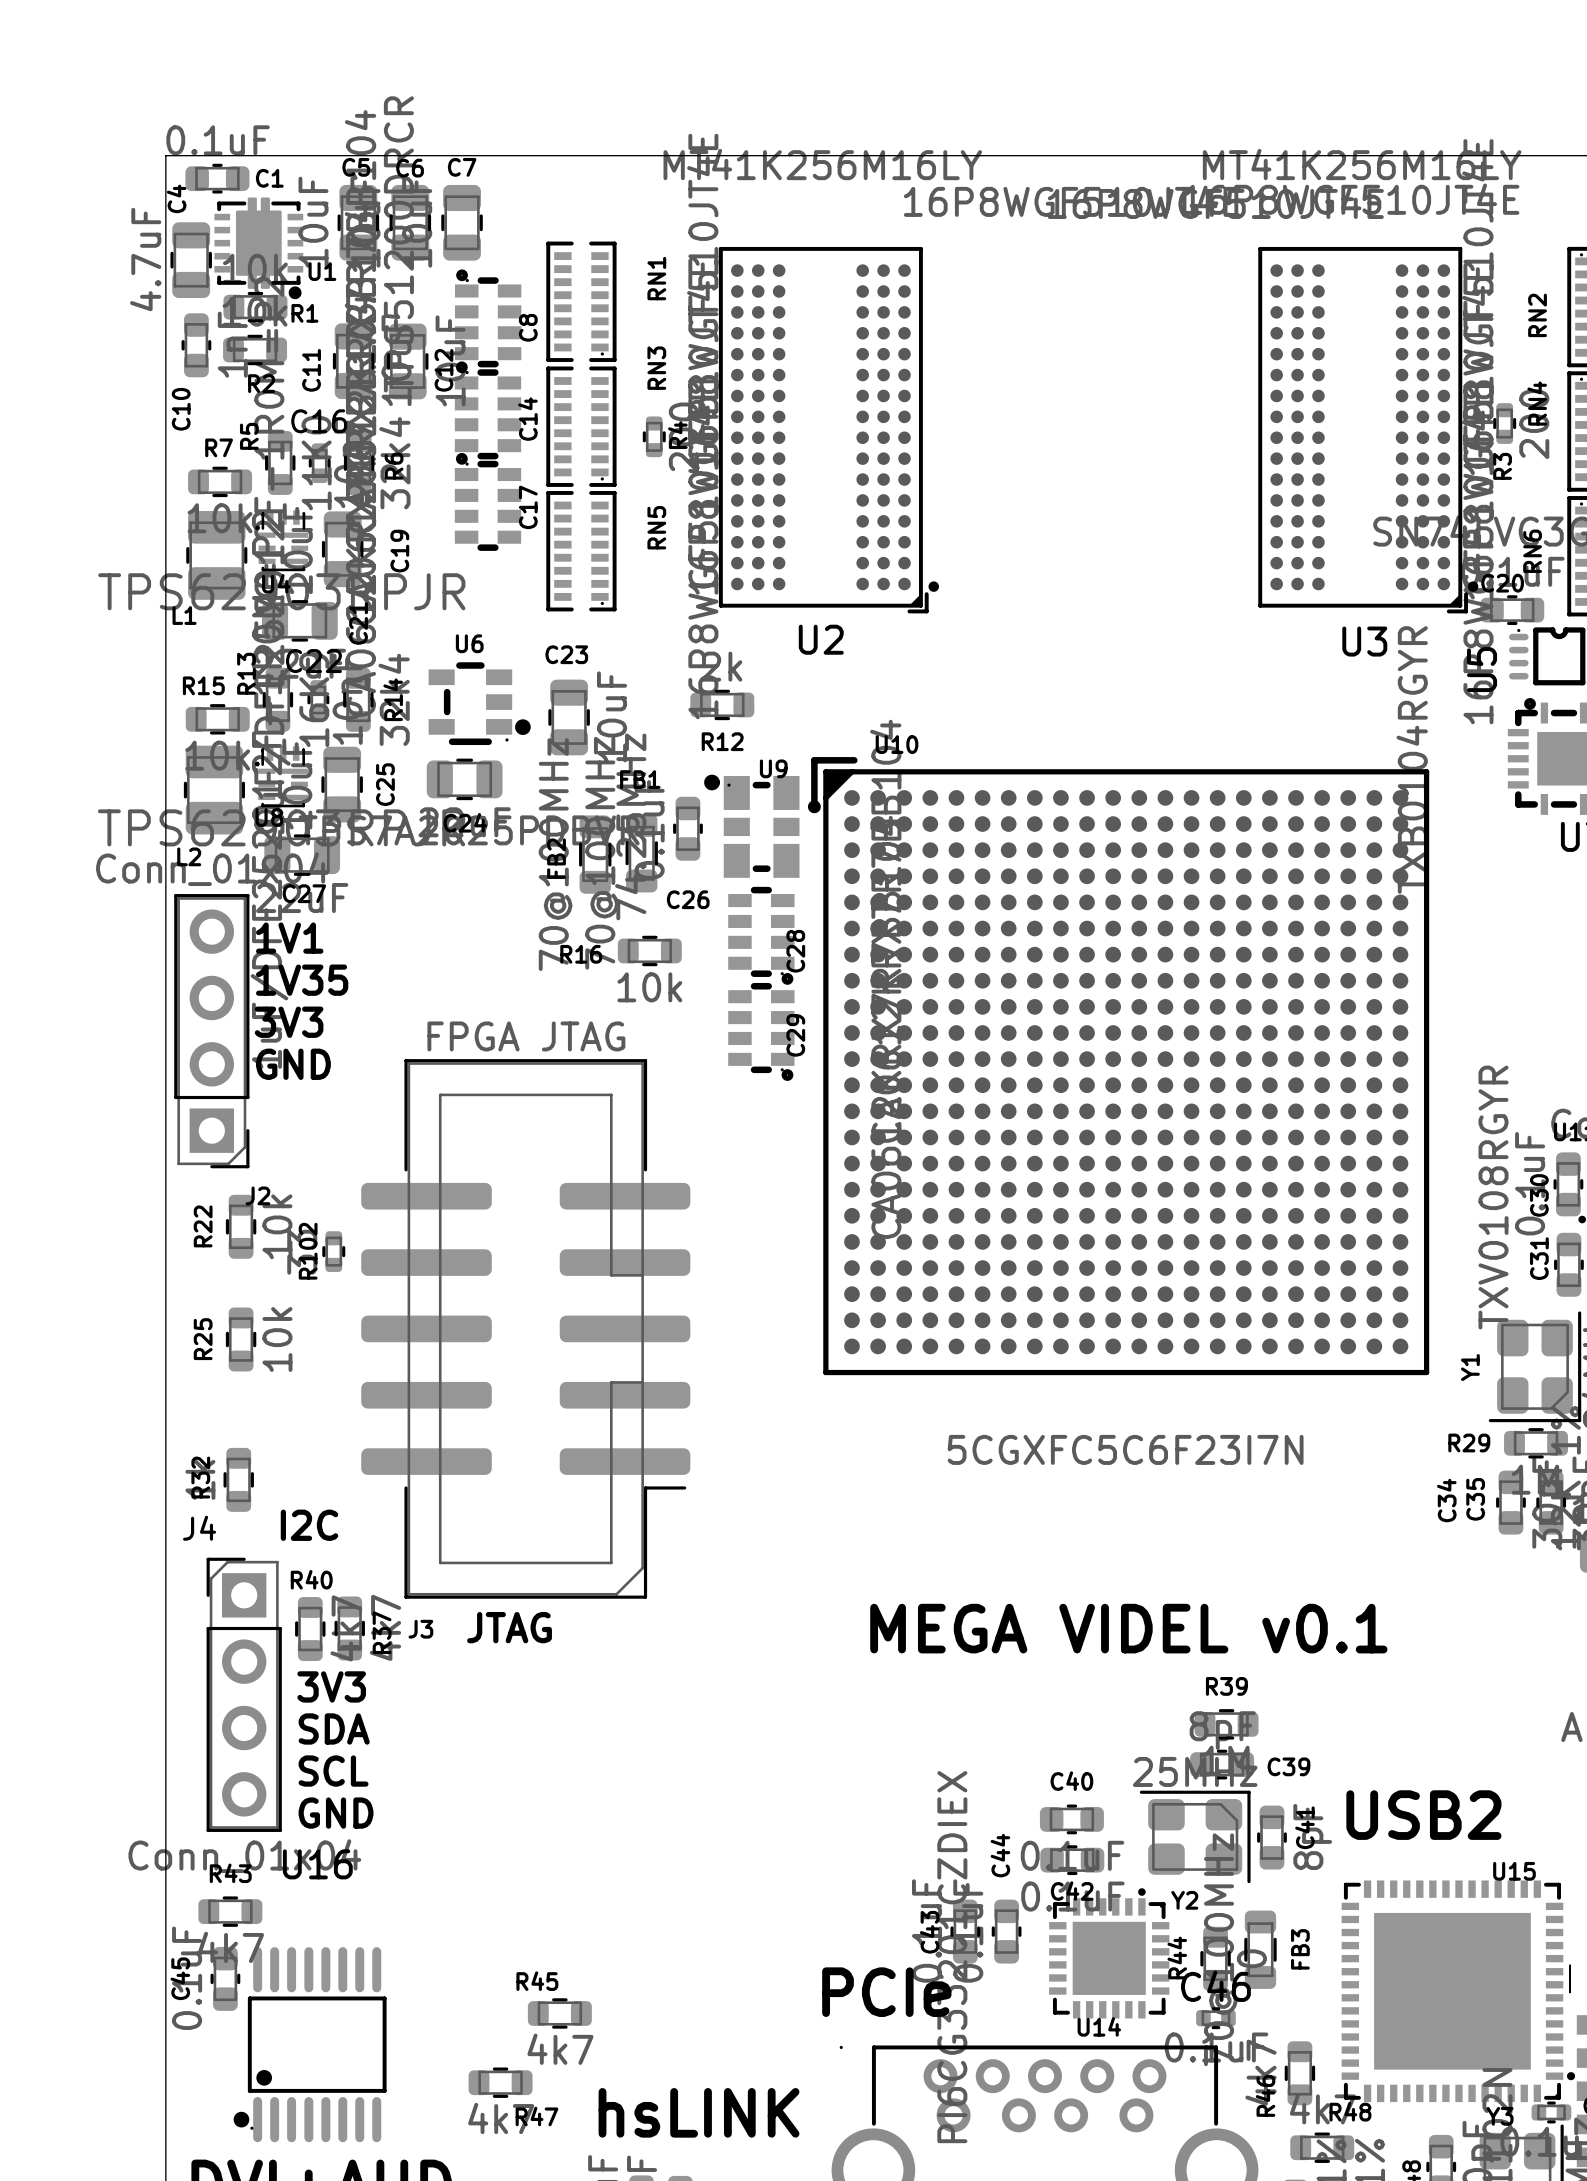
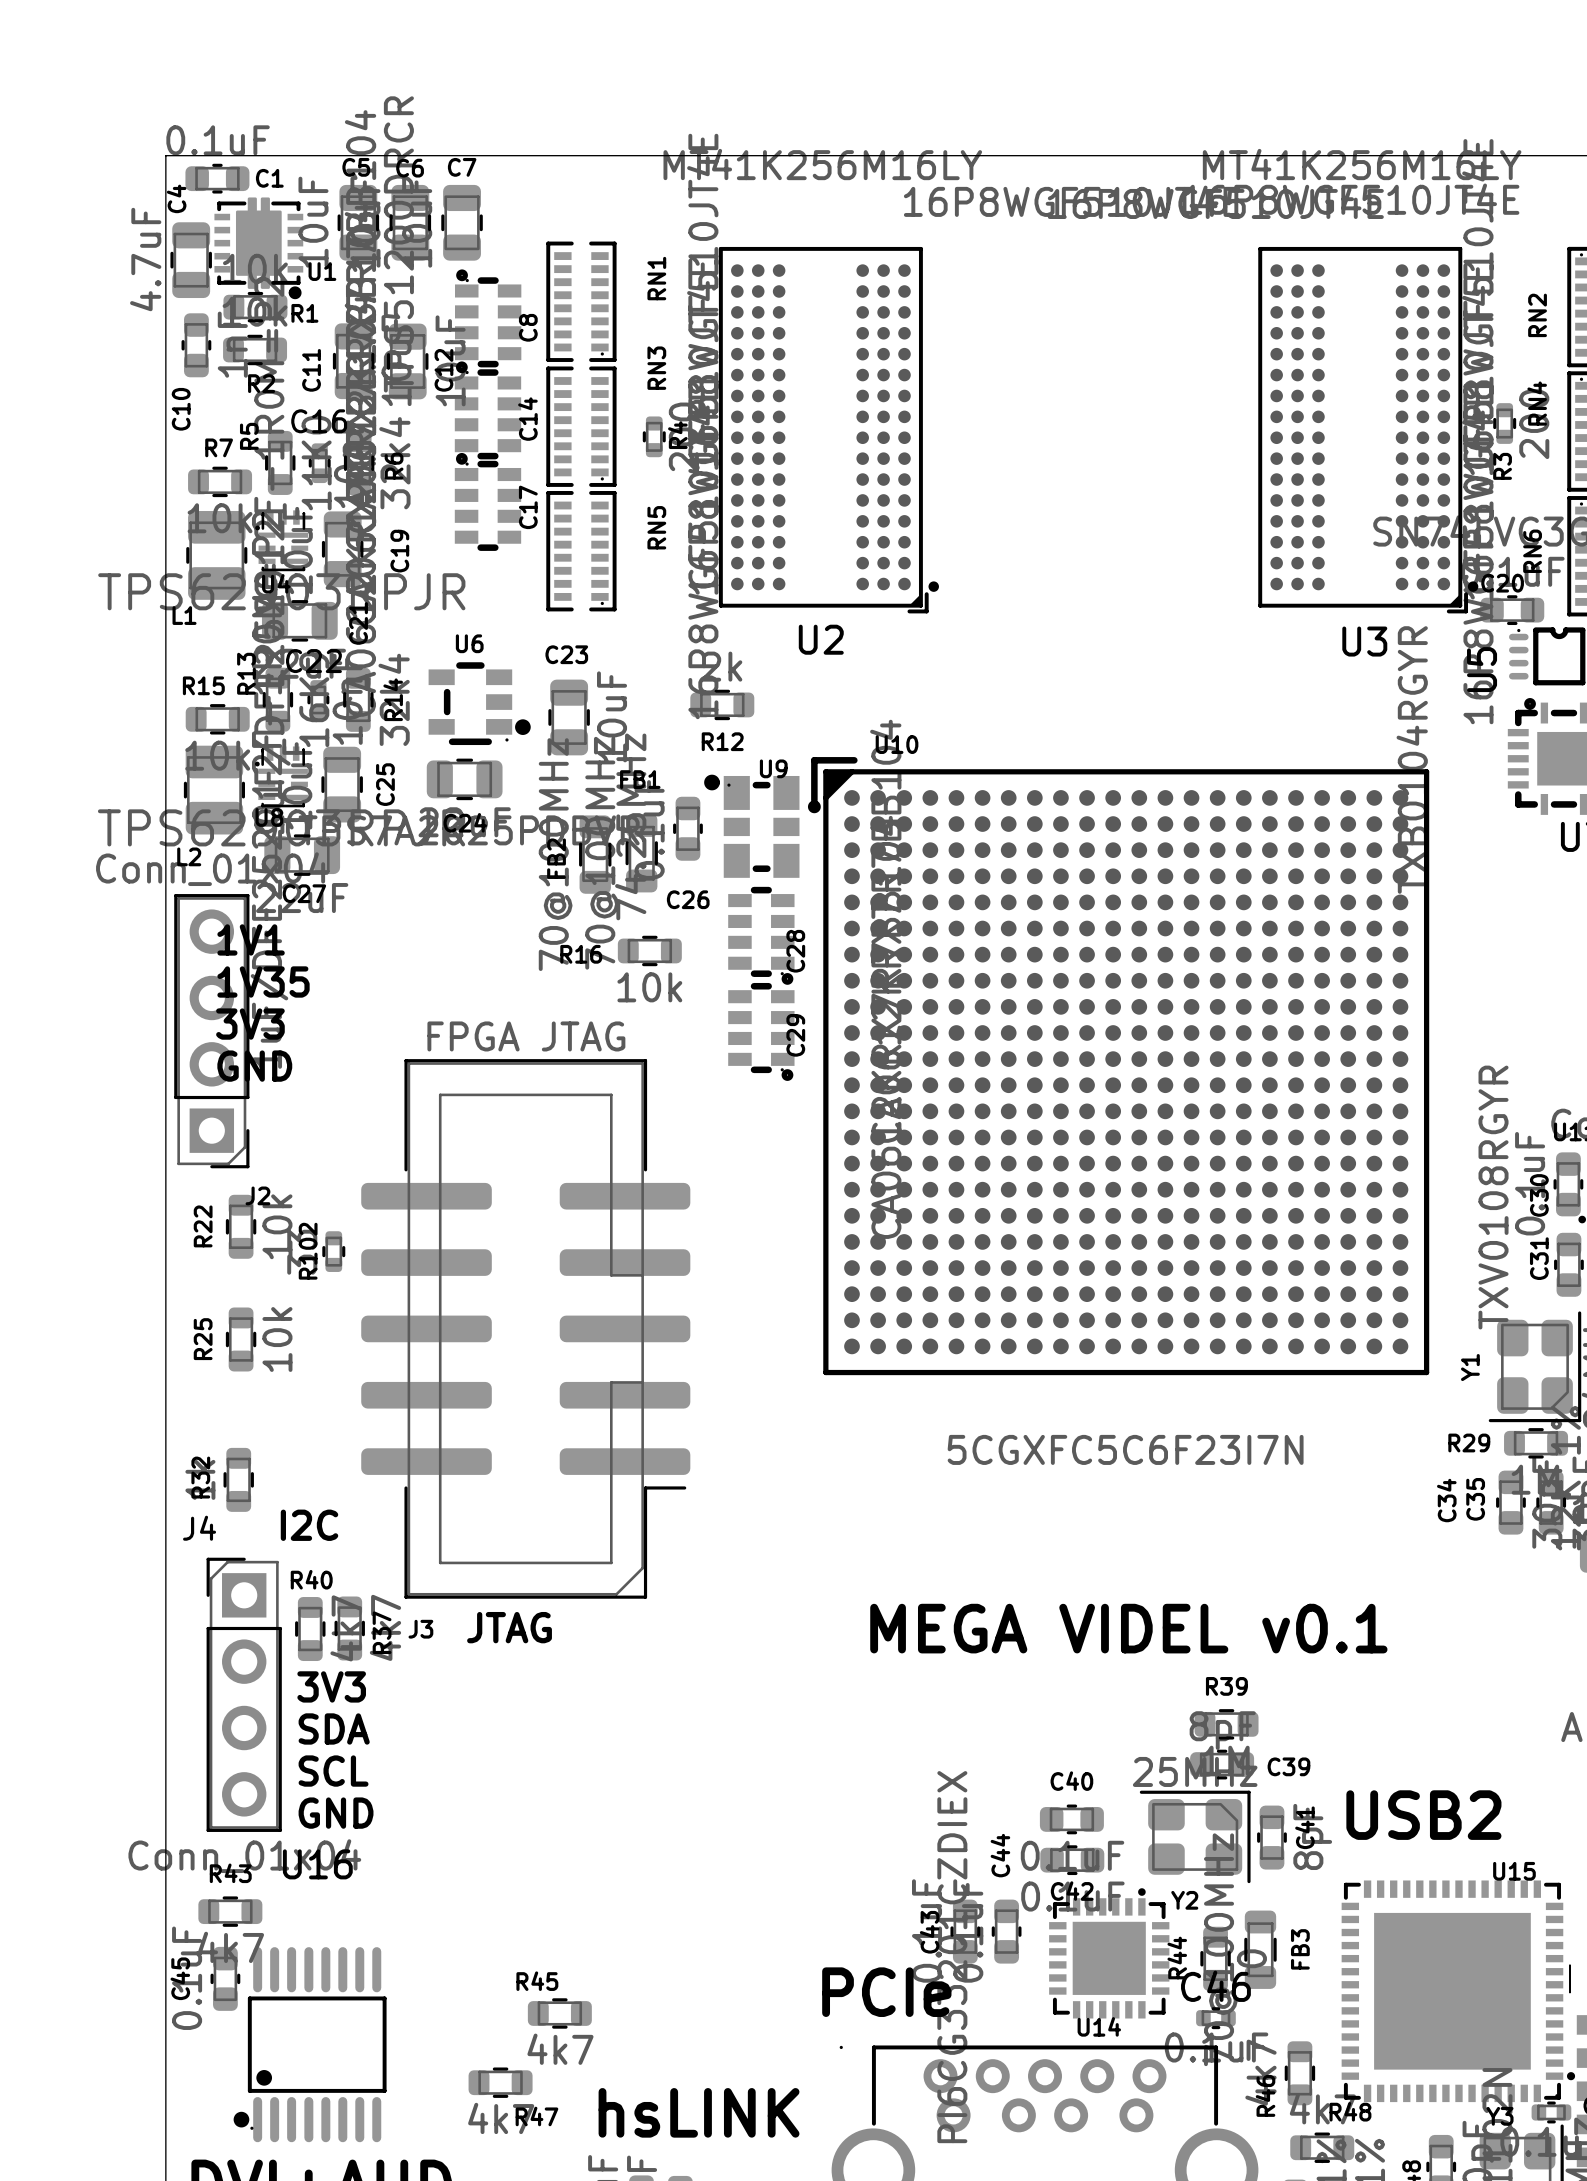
text position: 1V1 (289, 938) -> 1V1 (251, 939)
text position: 1V35 (302, 980) -> 1V35 (263, 982)
text position: 3V3 (289, 1022) -> 3V3 (250, 1024)
text position: GND (293, 1064) -> GND (254, 1066)

